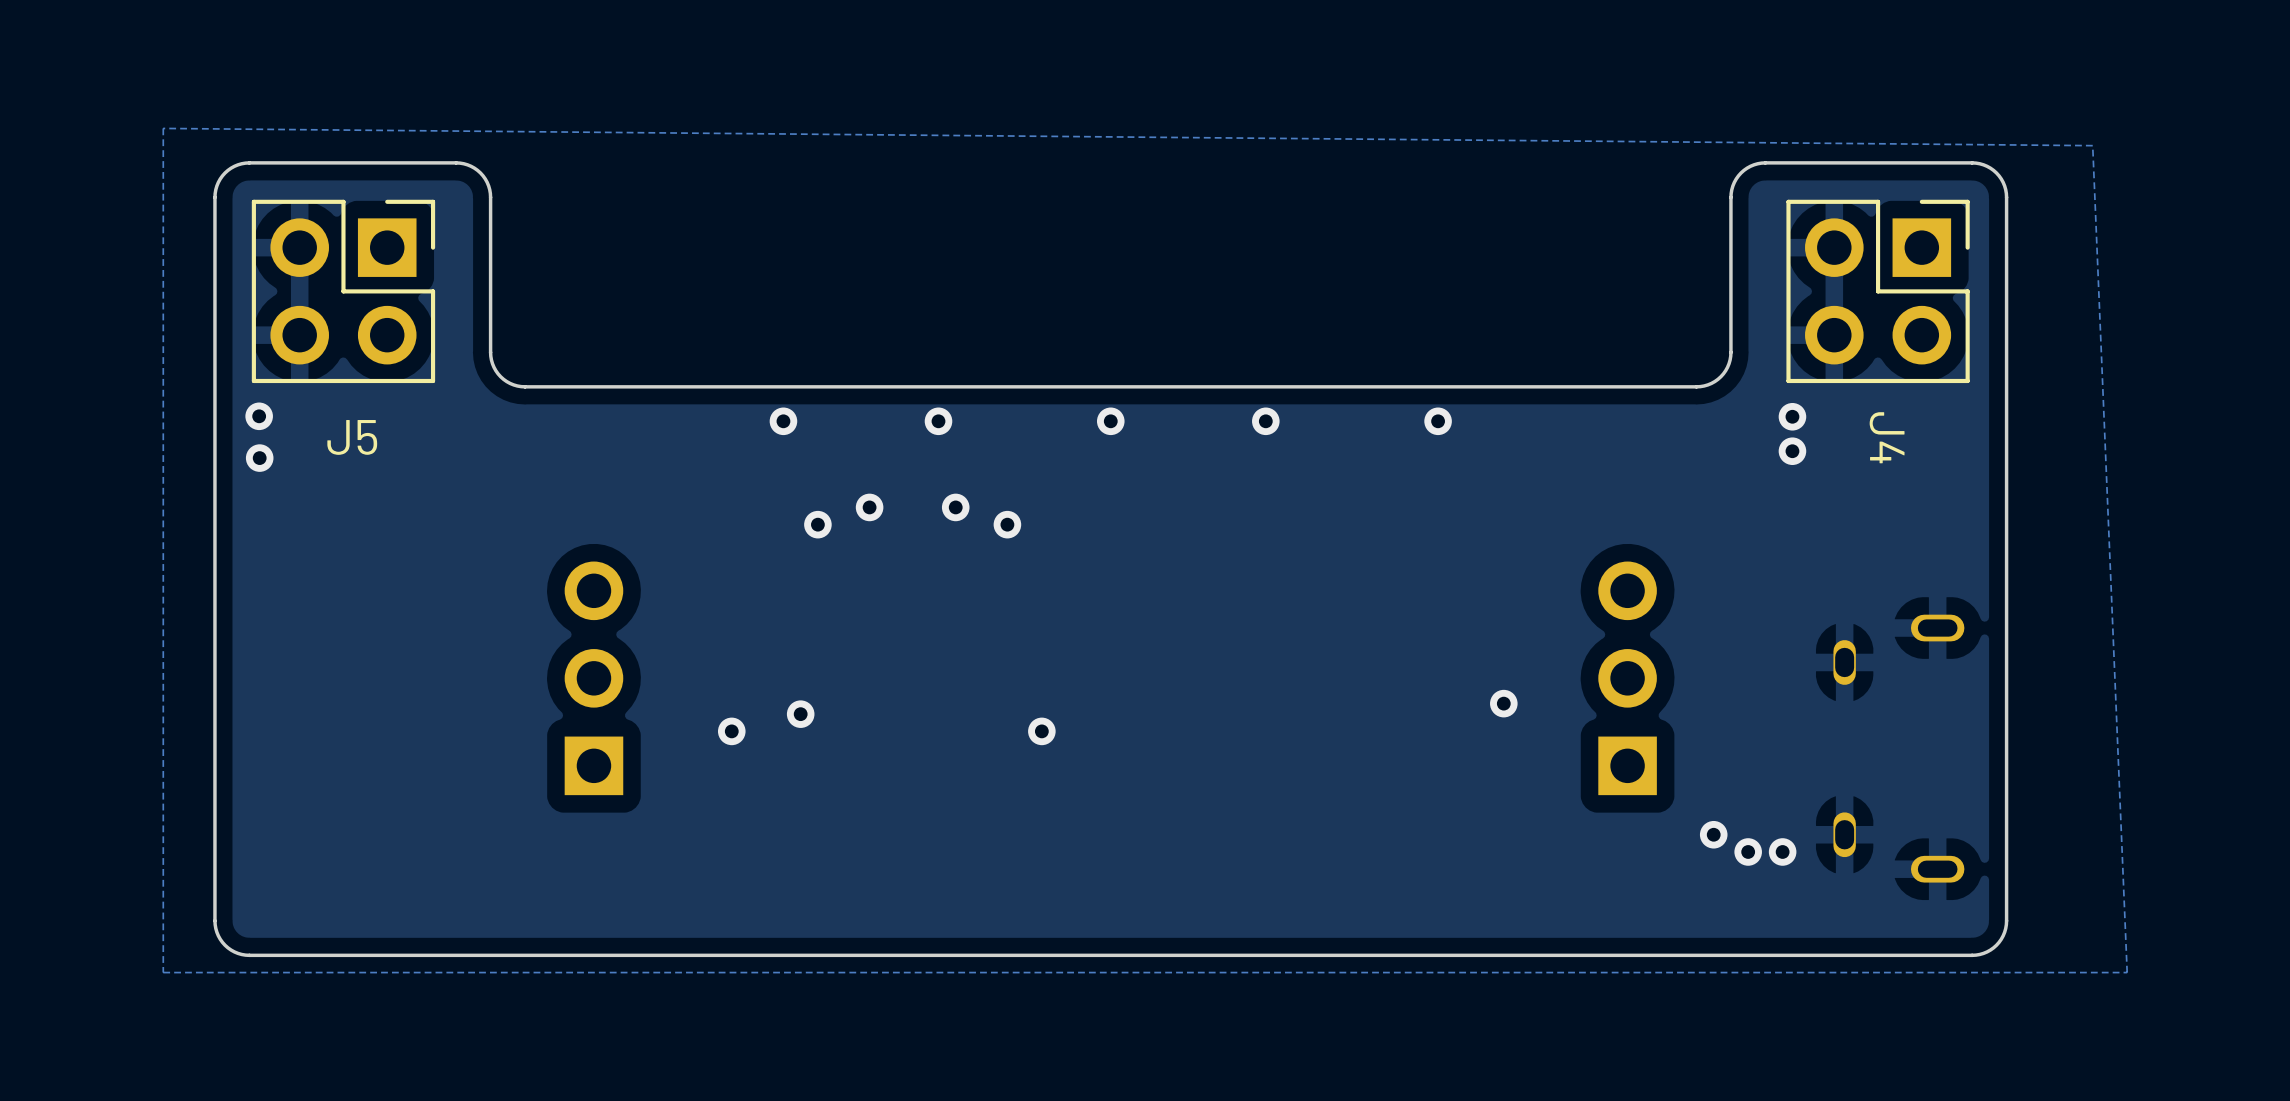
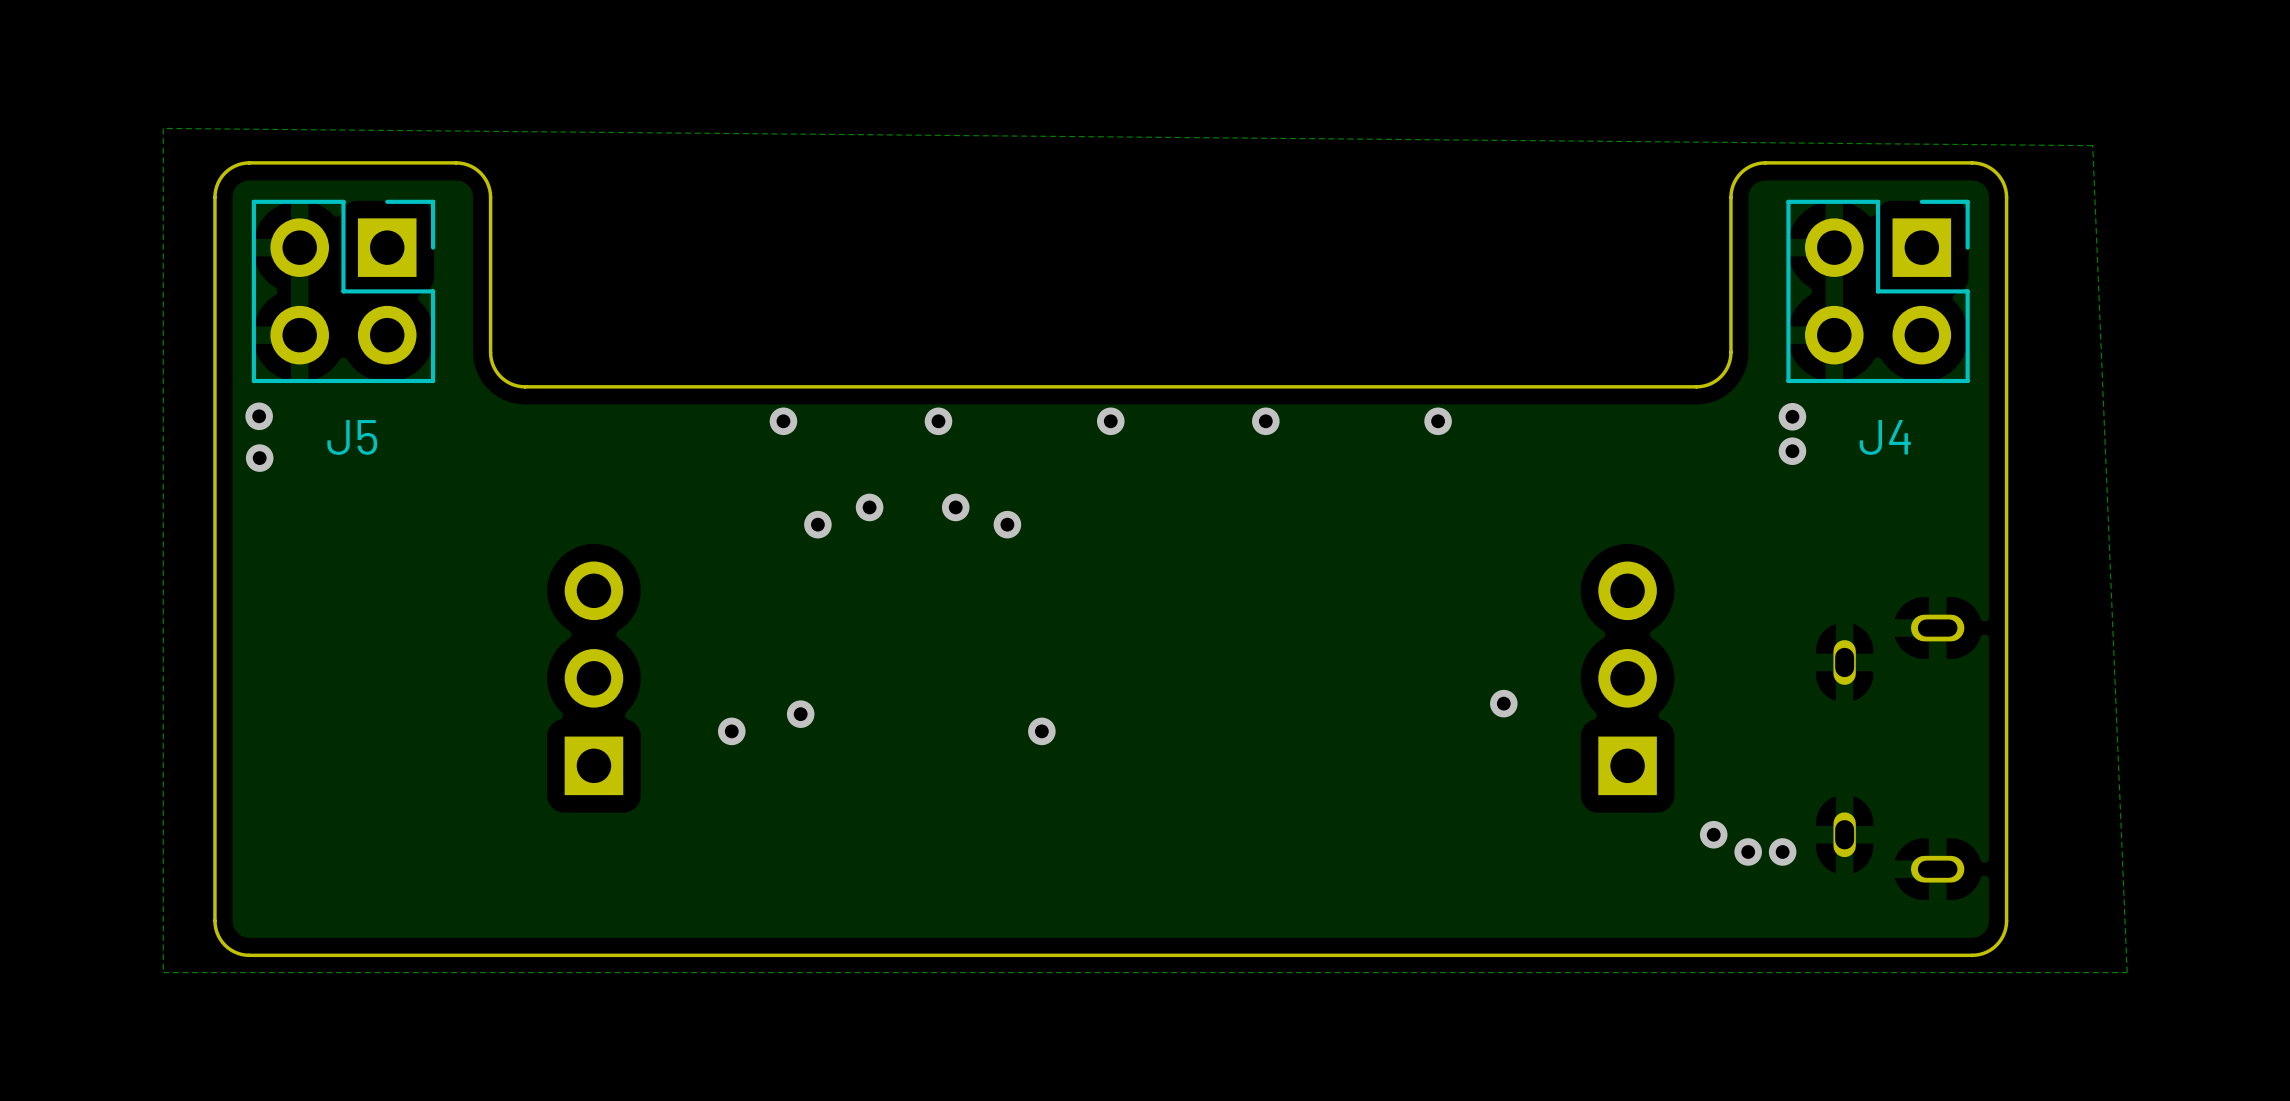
J4 name rotation: 0° (1887, 437) -> 90° counterclockwise (1885, 437)

